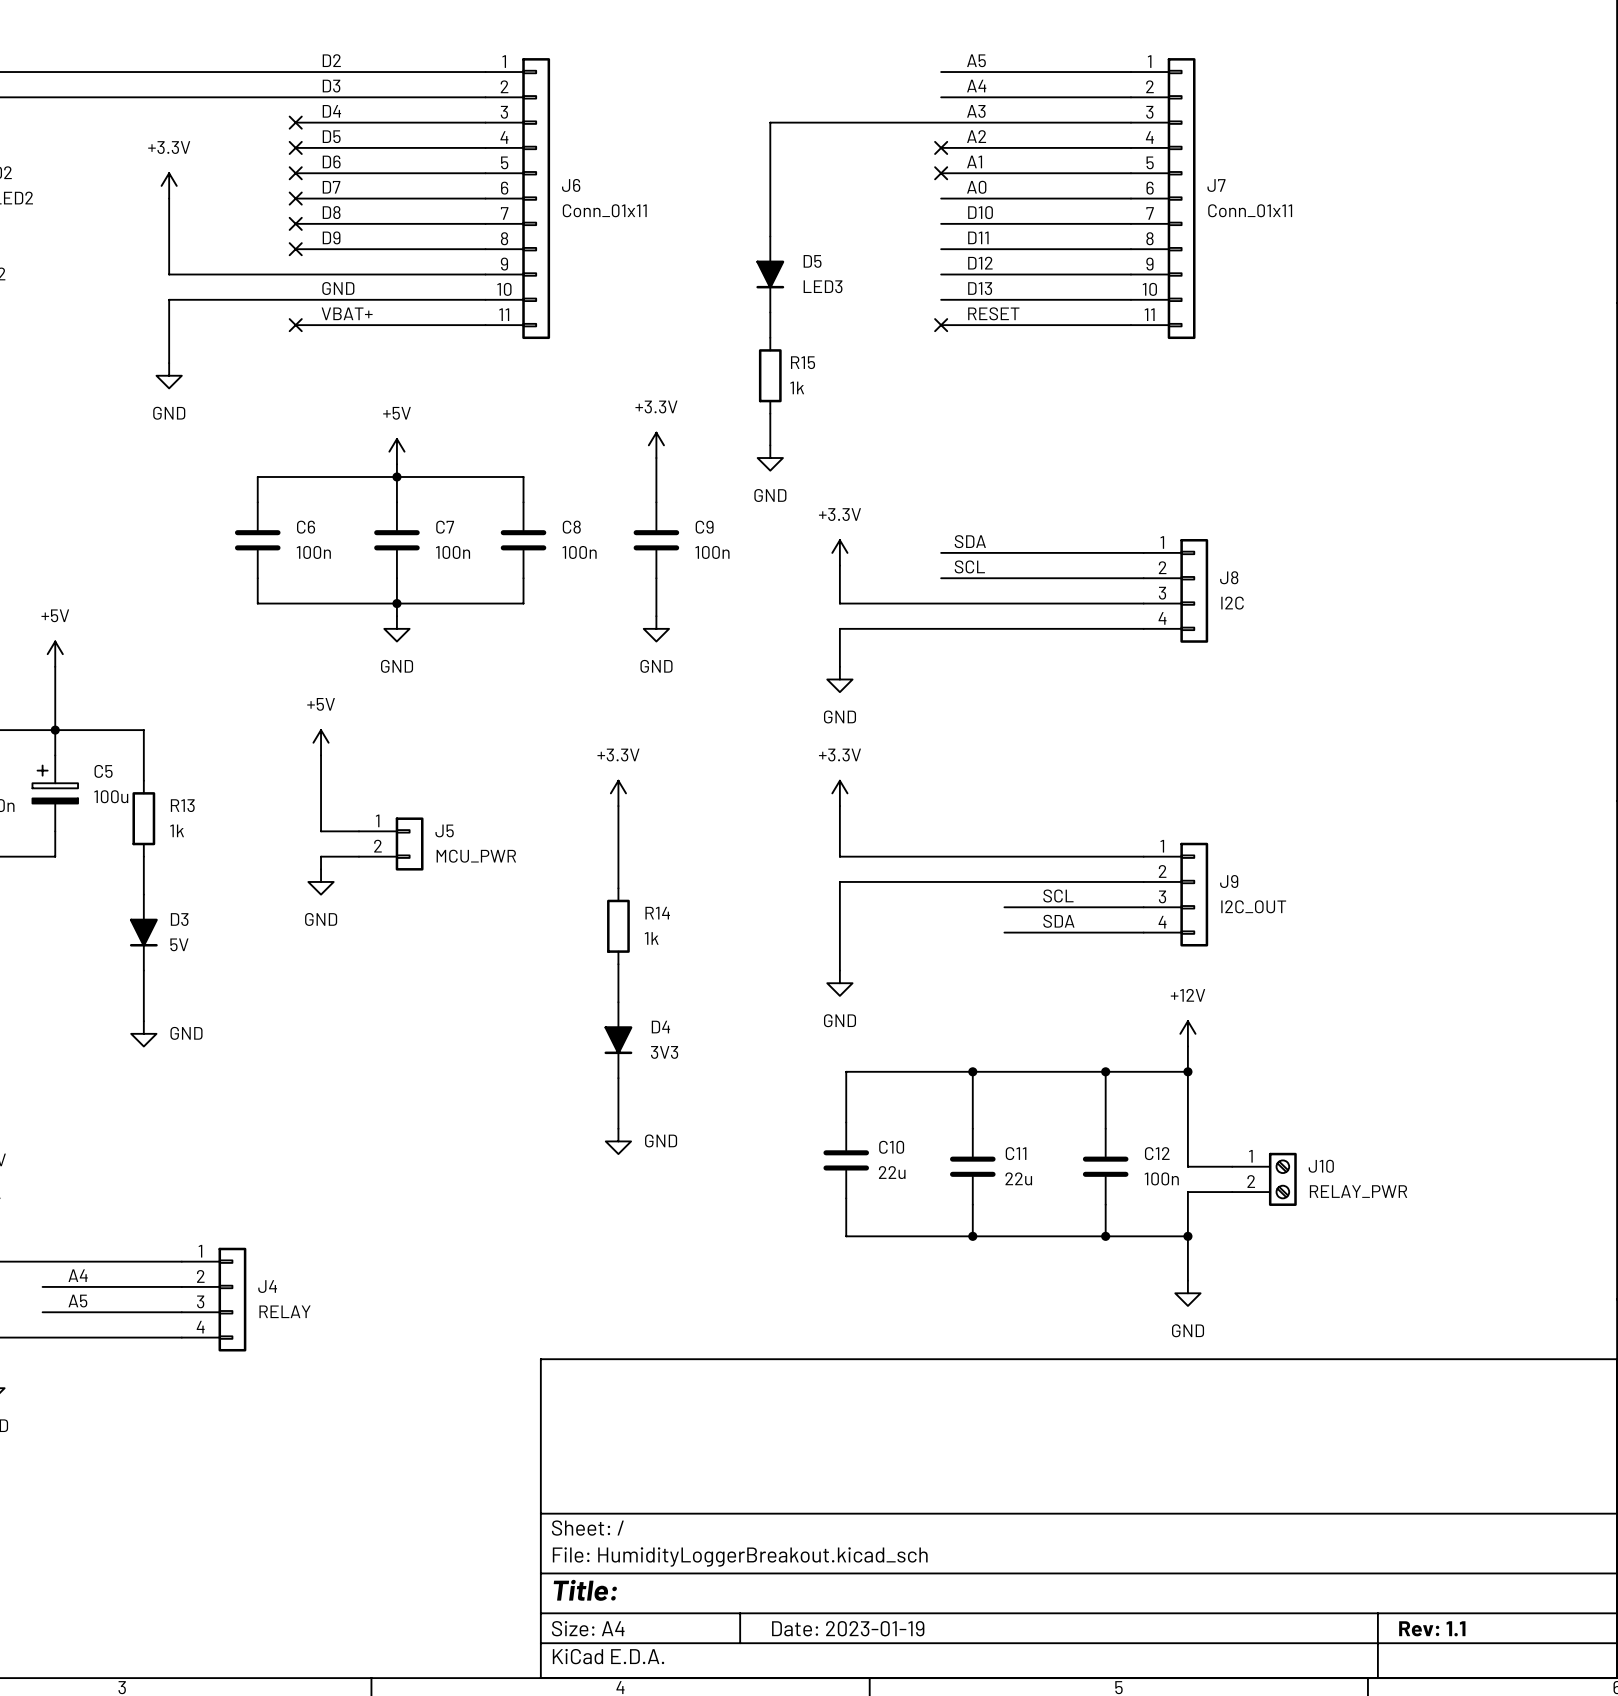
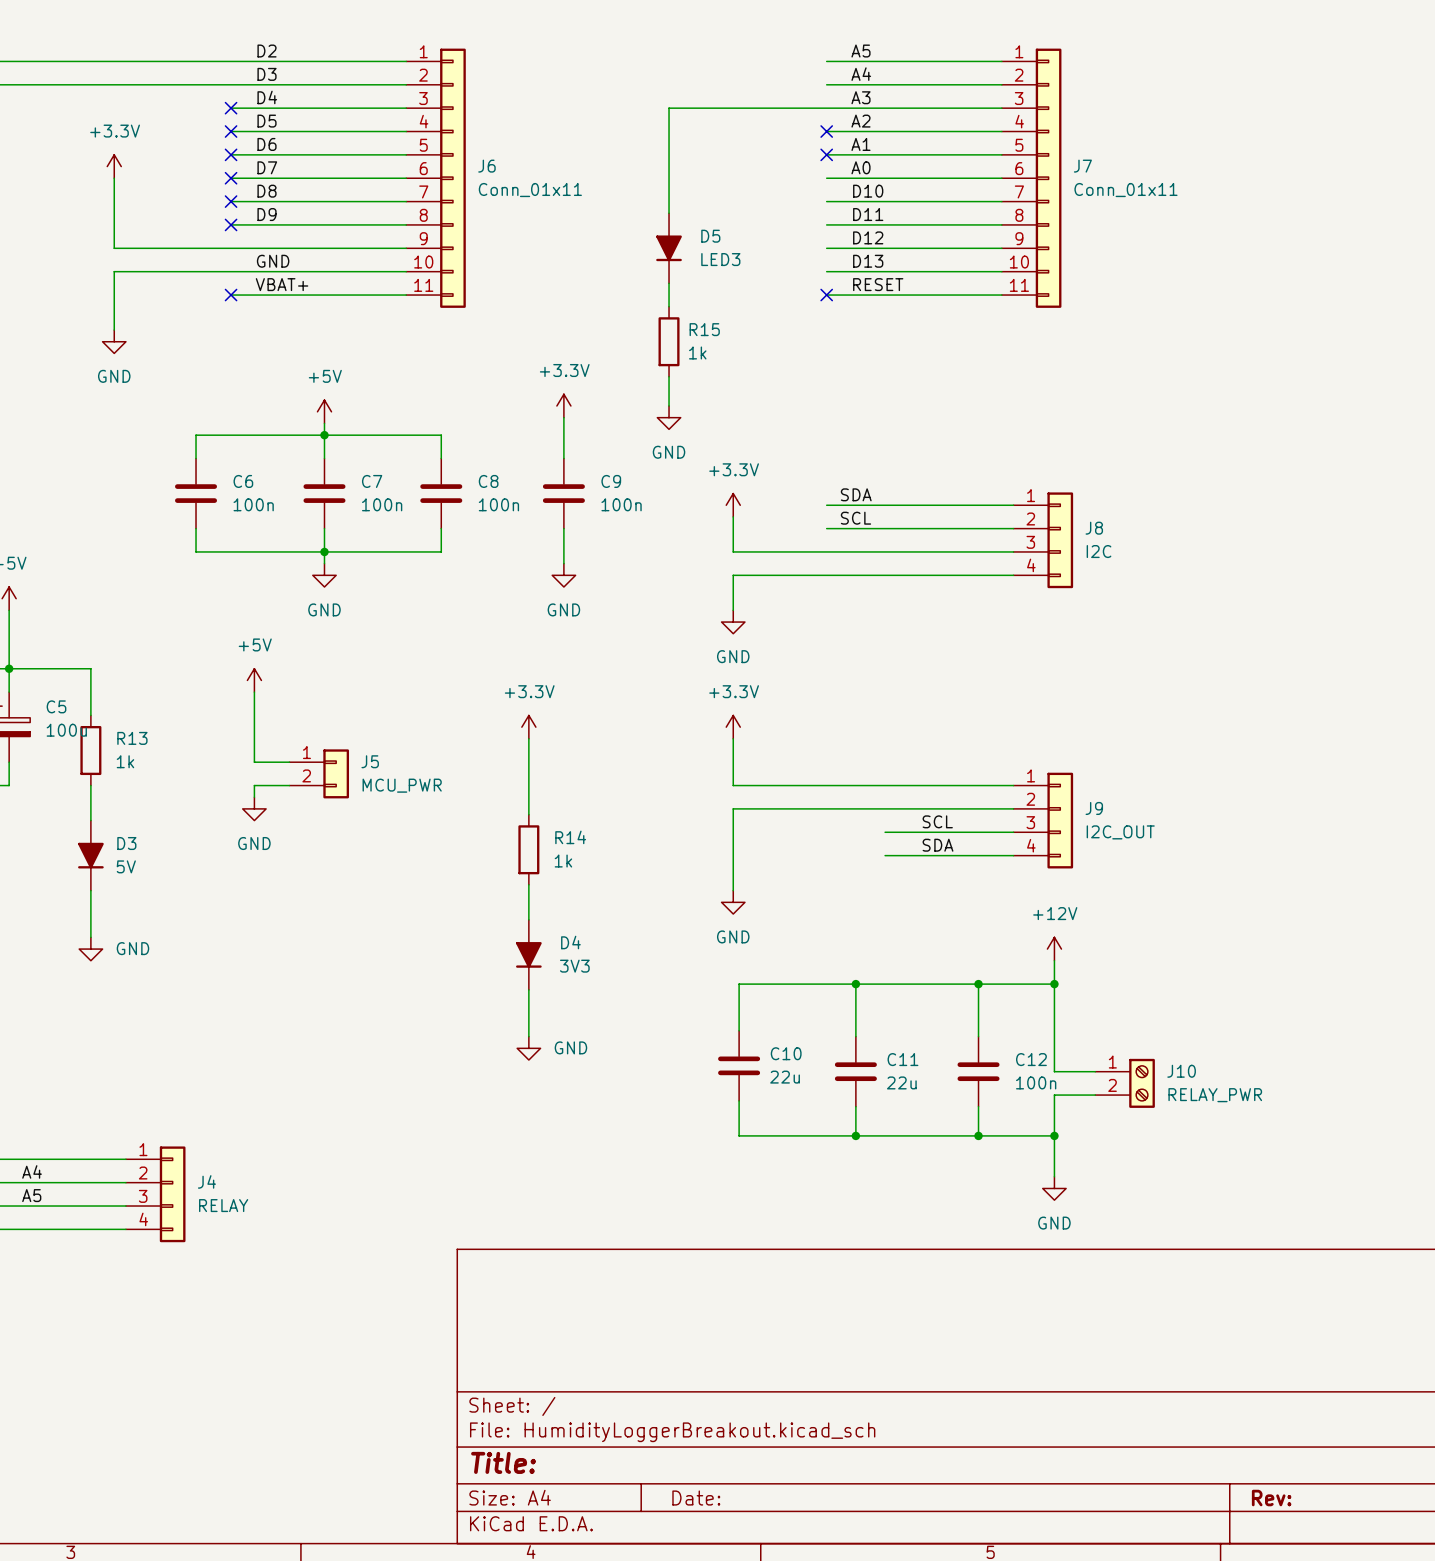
title block: Date: 2023-01-19 (848, 1628) -> Date: (696, 1498)
title block: Rev: 1.1 (1432, 1628) -> Rev: (1271, 1498)

